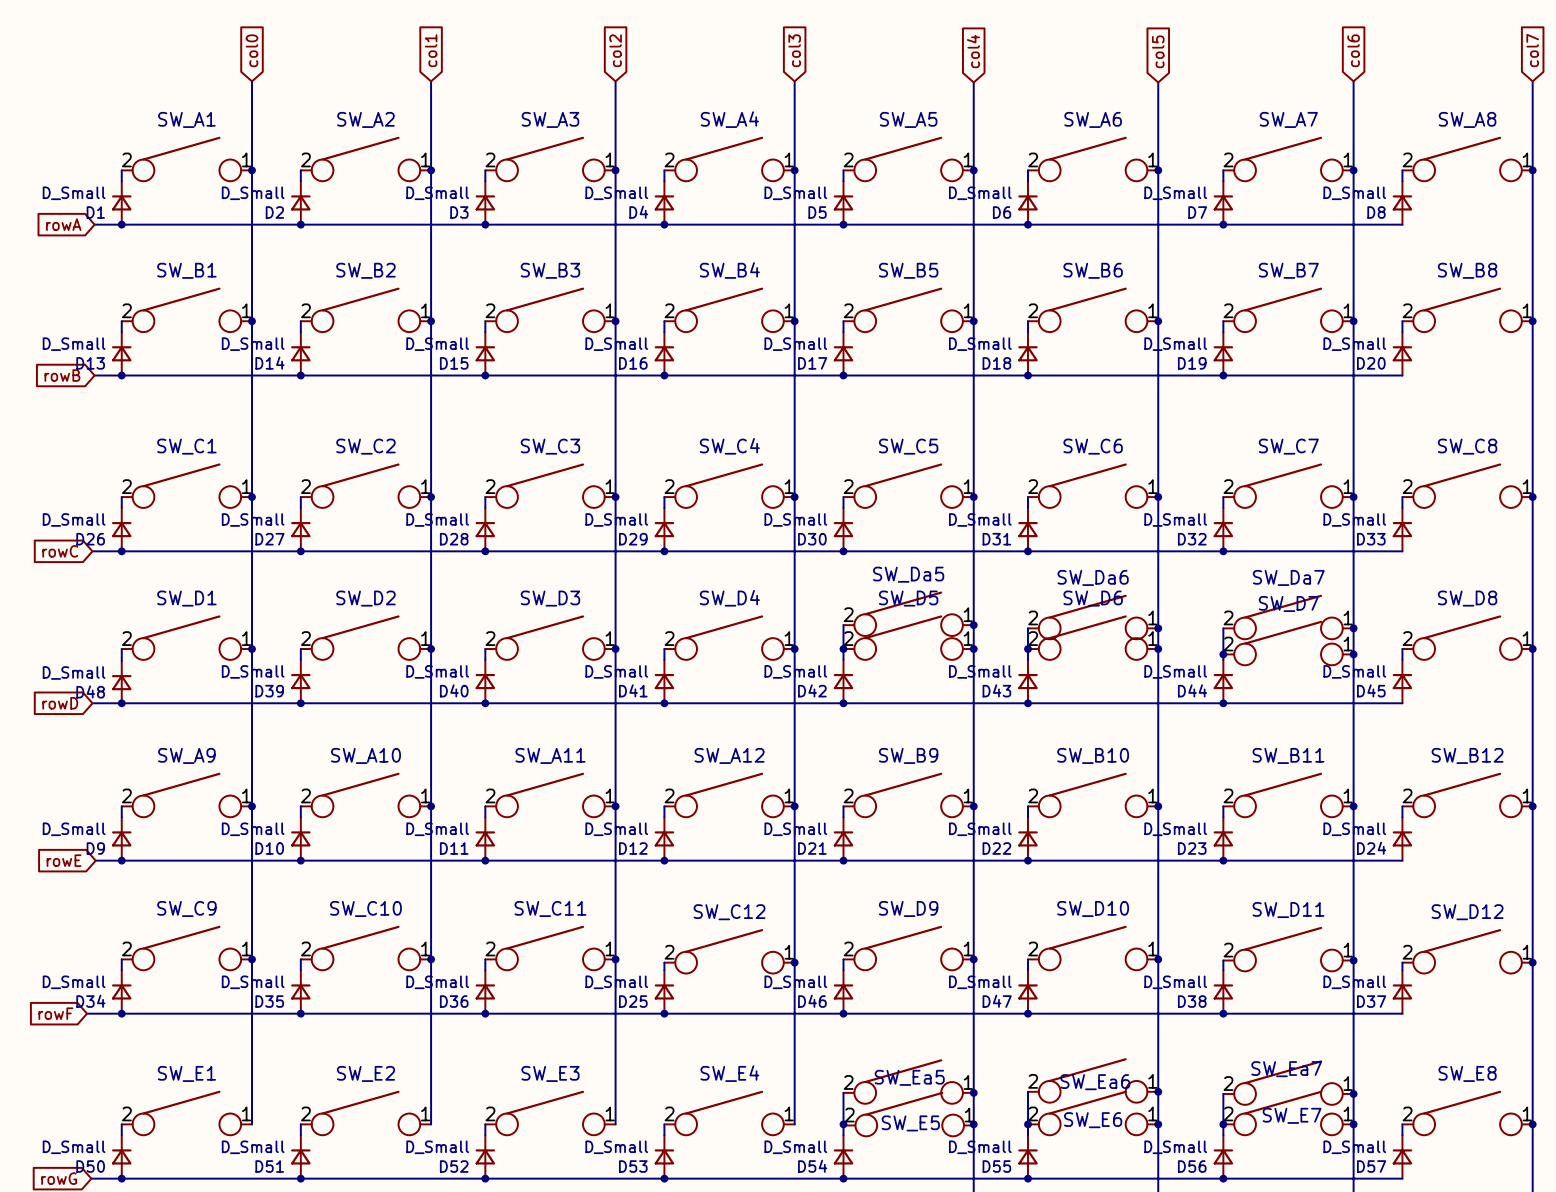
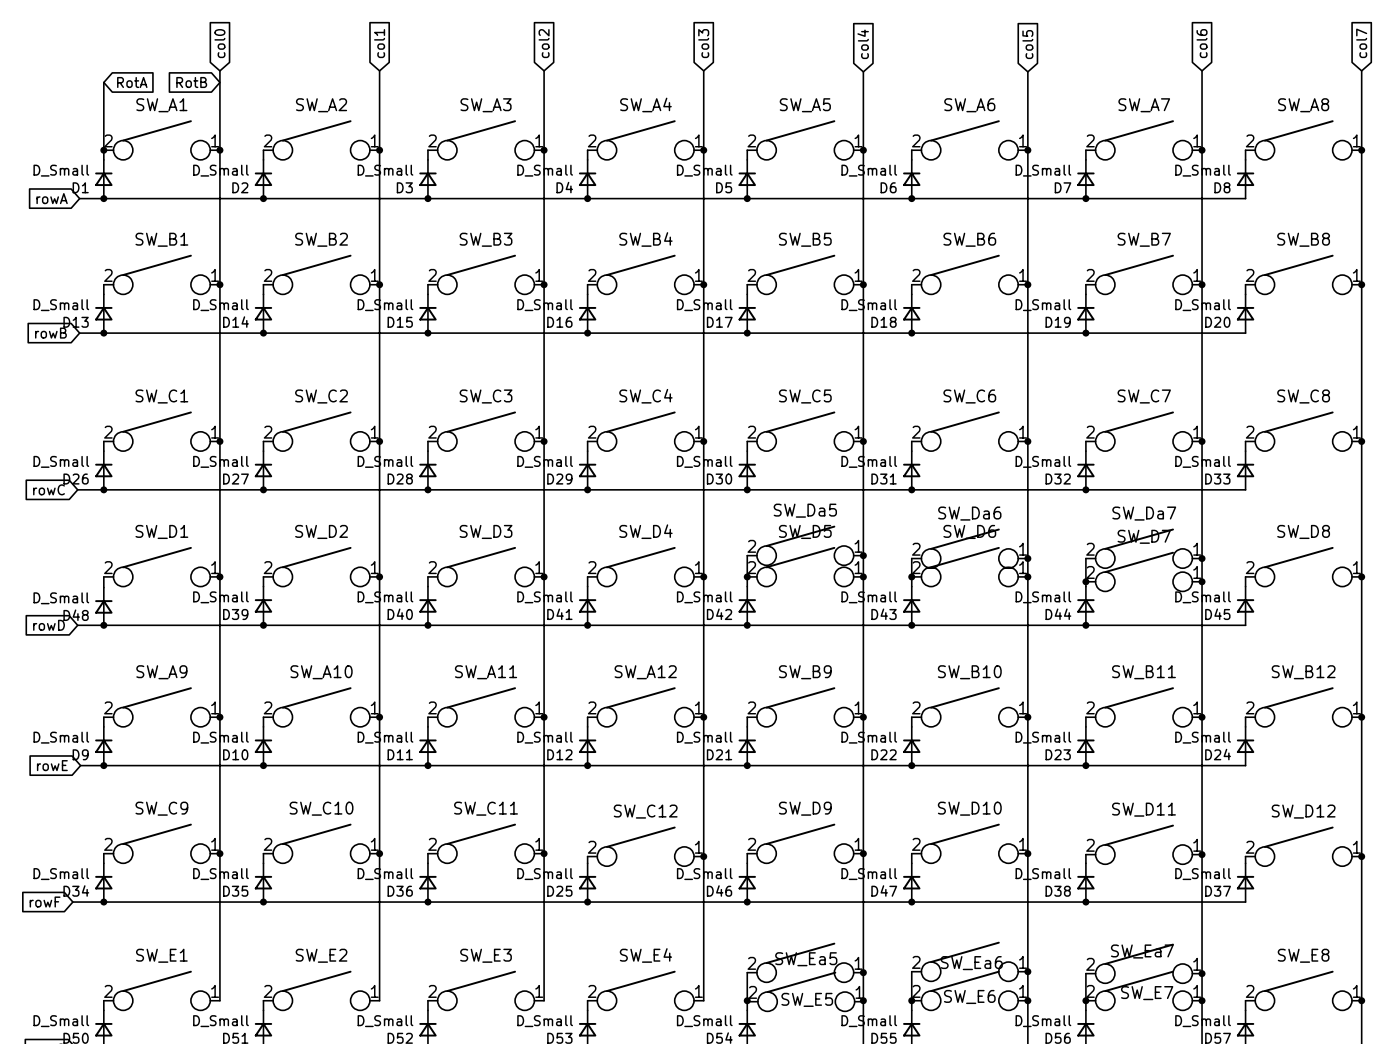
wire: none -> (103, 82) (103, 150)
global label: none -> RotA (132, 82)
global label: none -> RotB (191, 82)
junction: none -> (103, 150)

